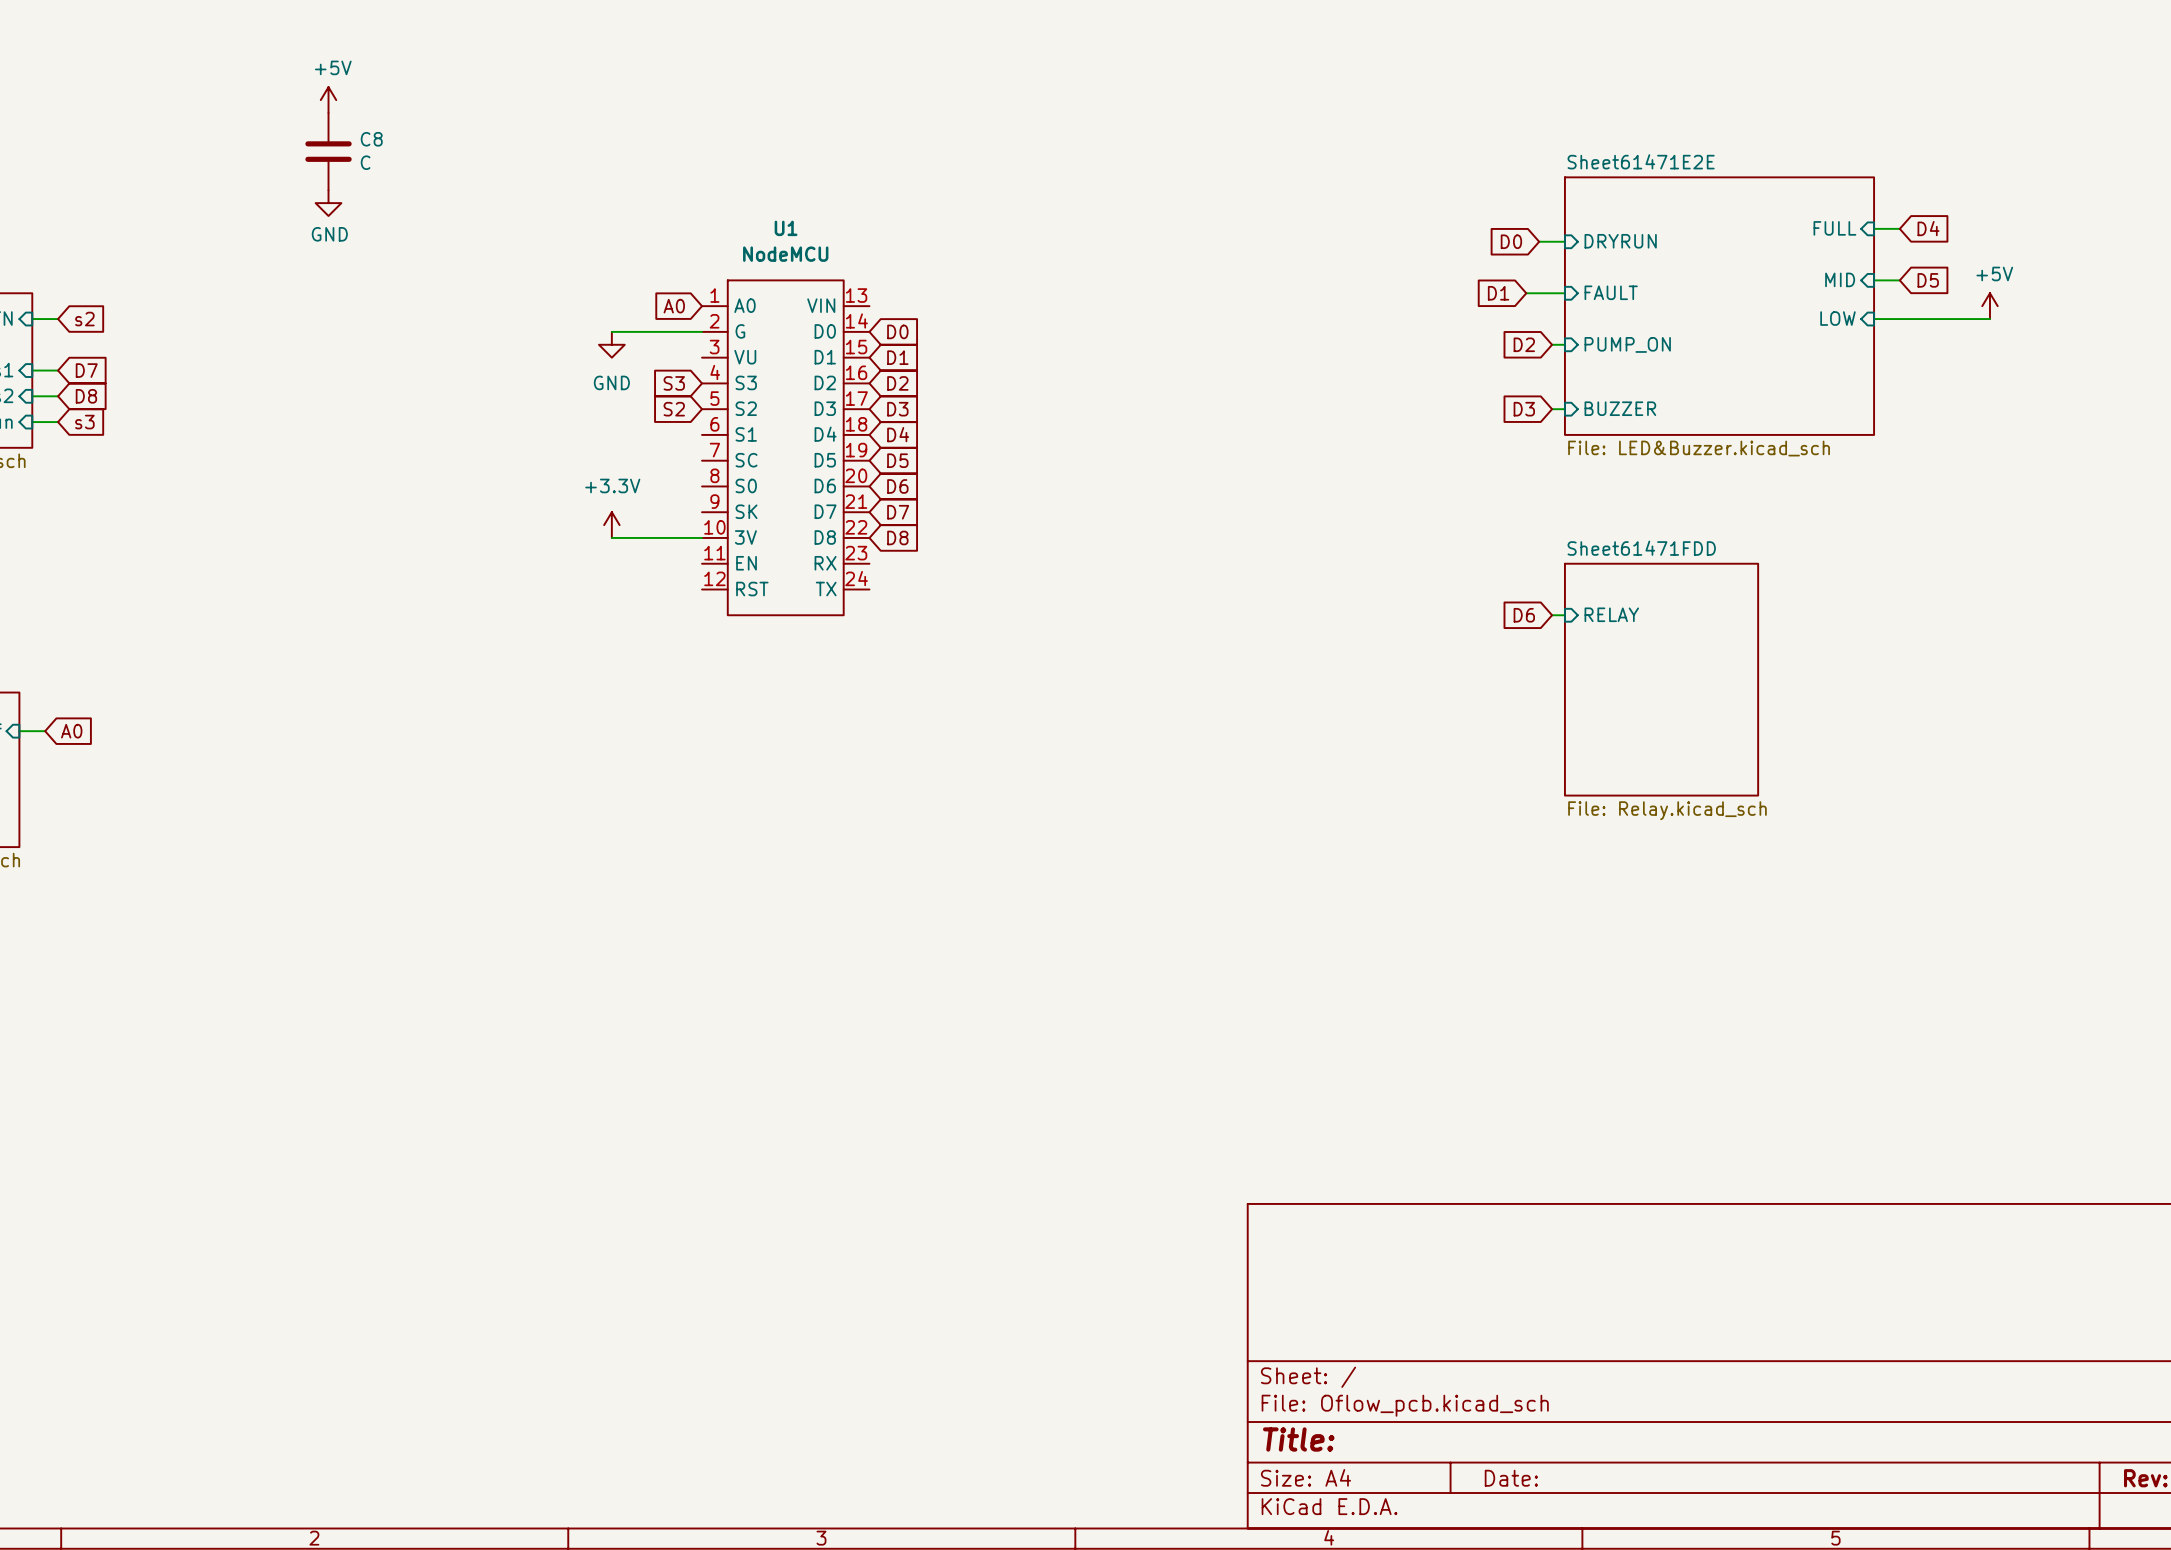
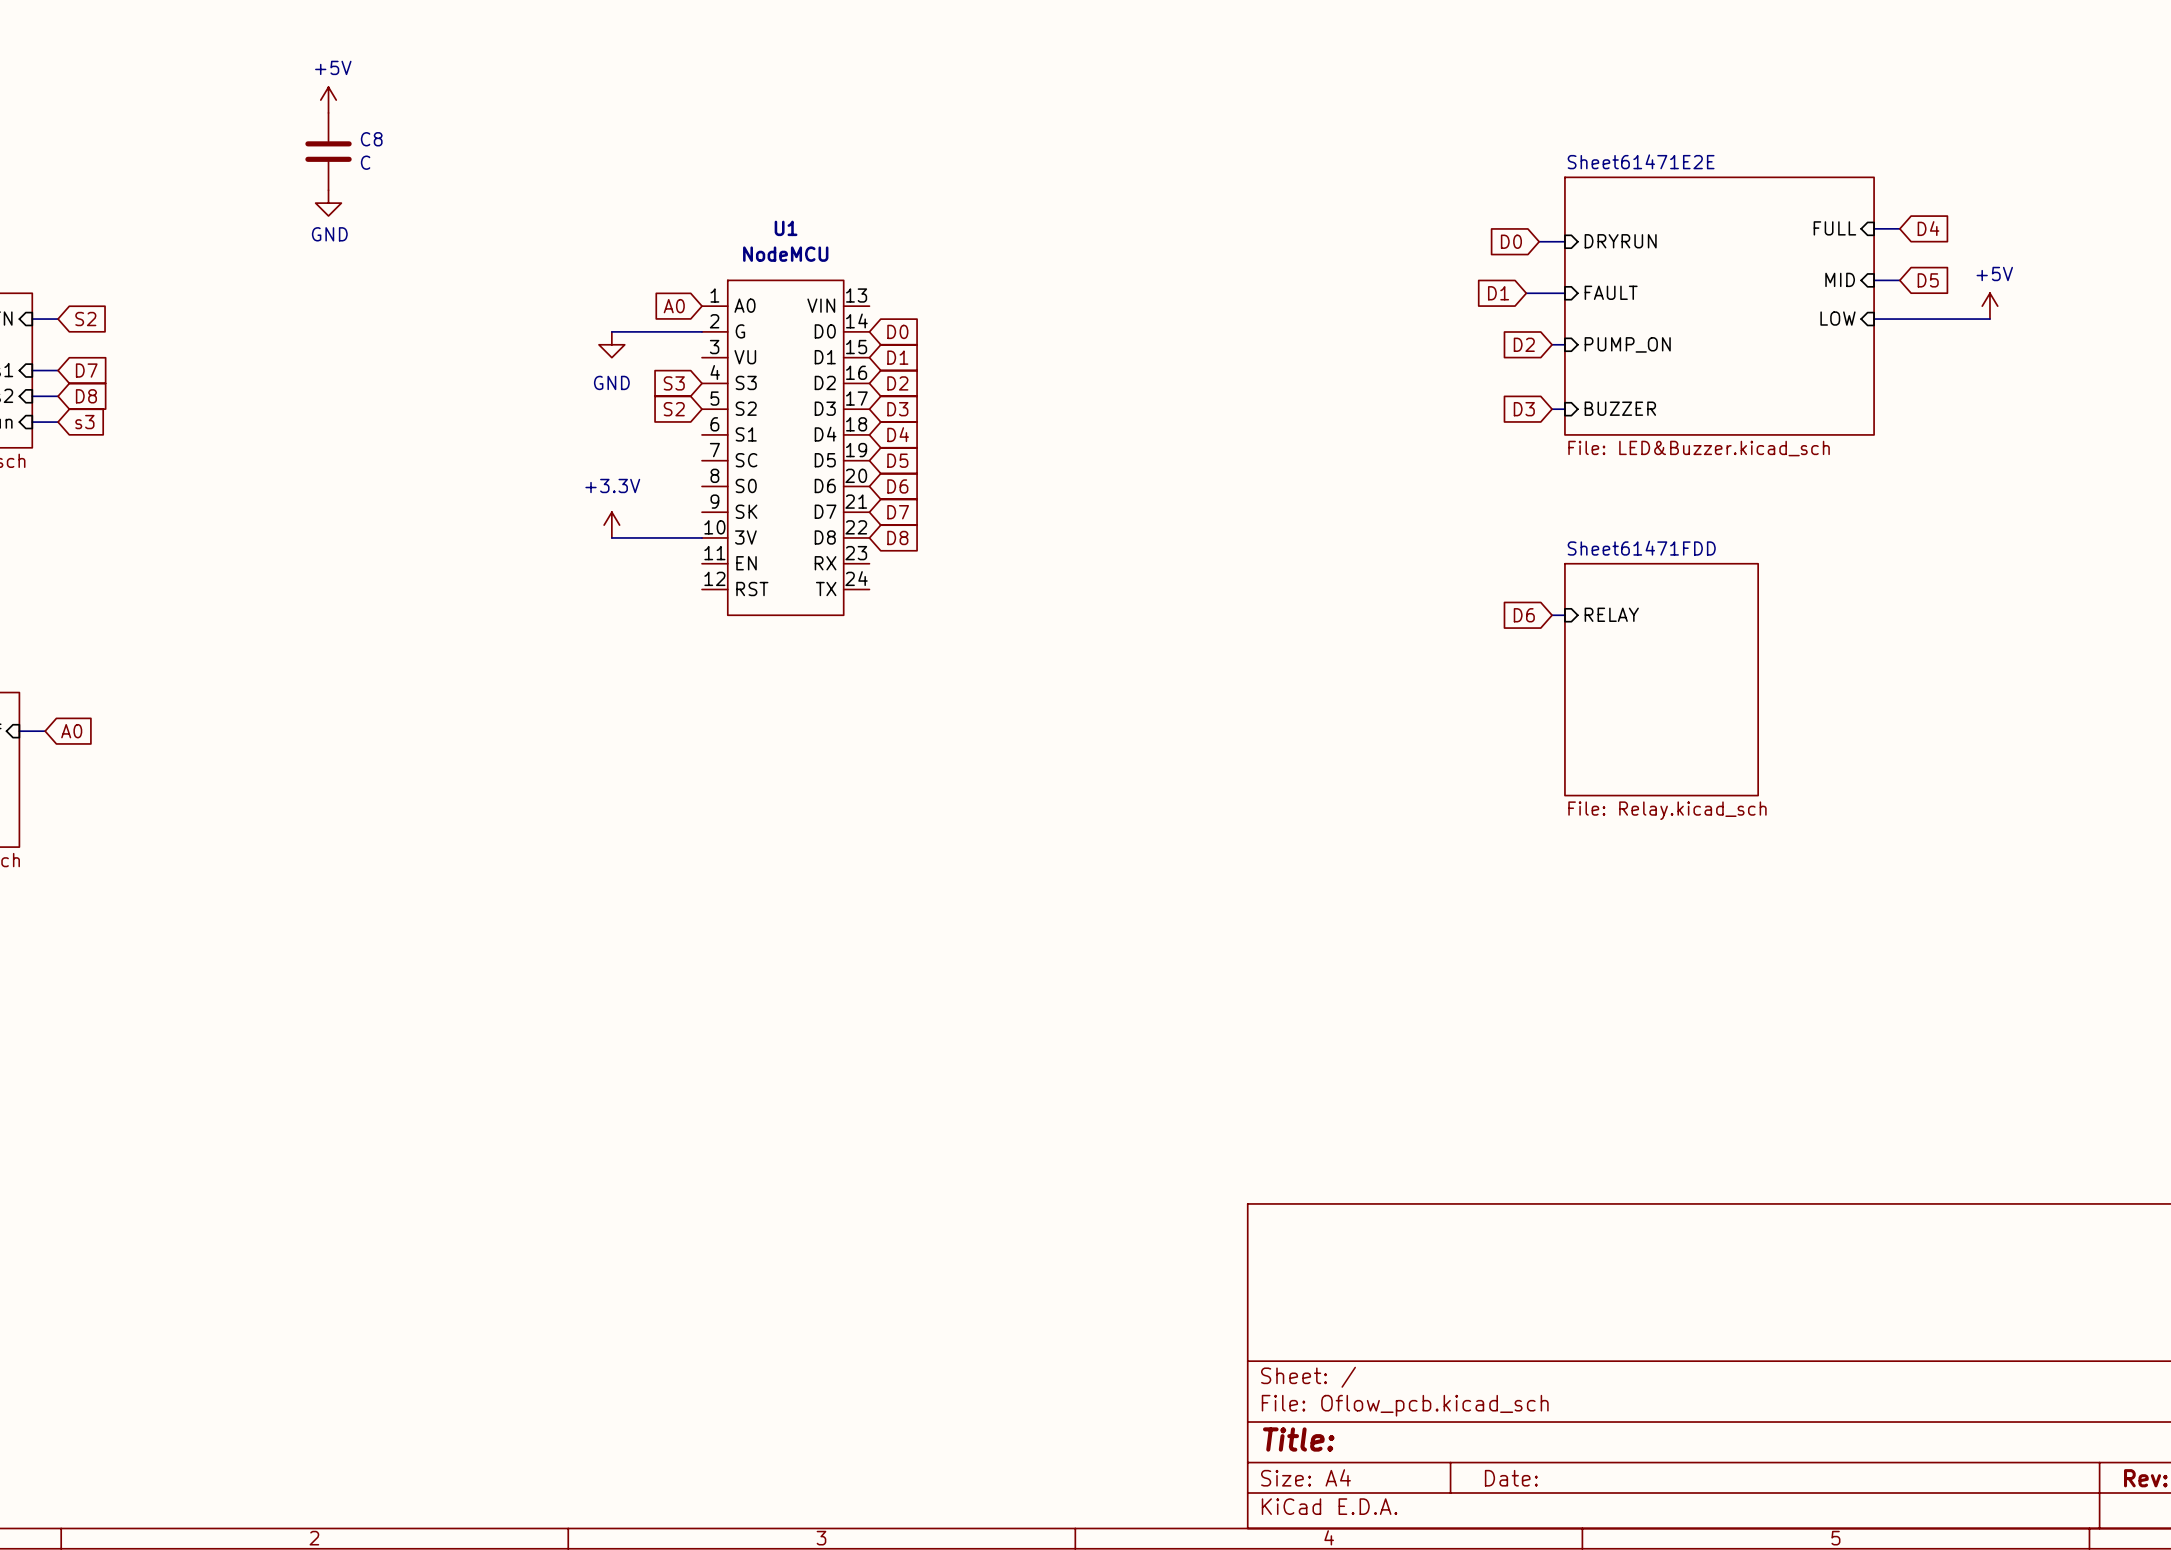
global label: s2 (84, 319) -> S2 (85, 319)

